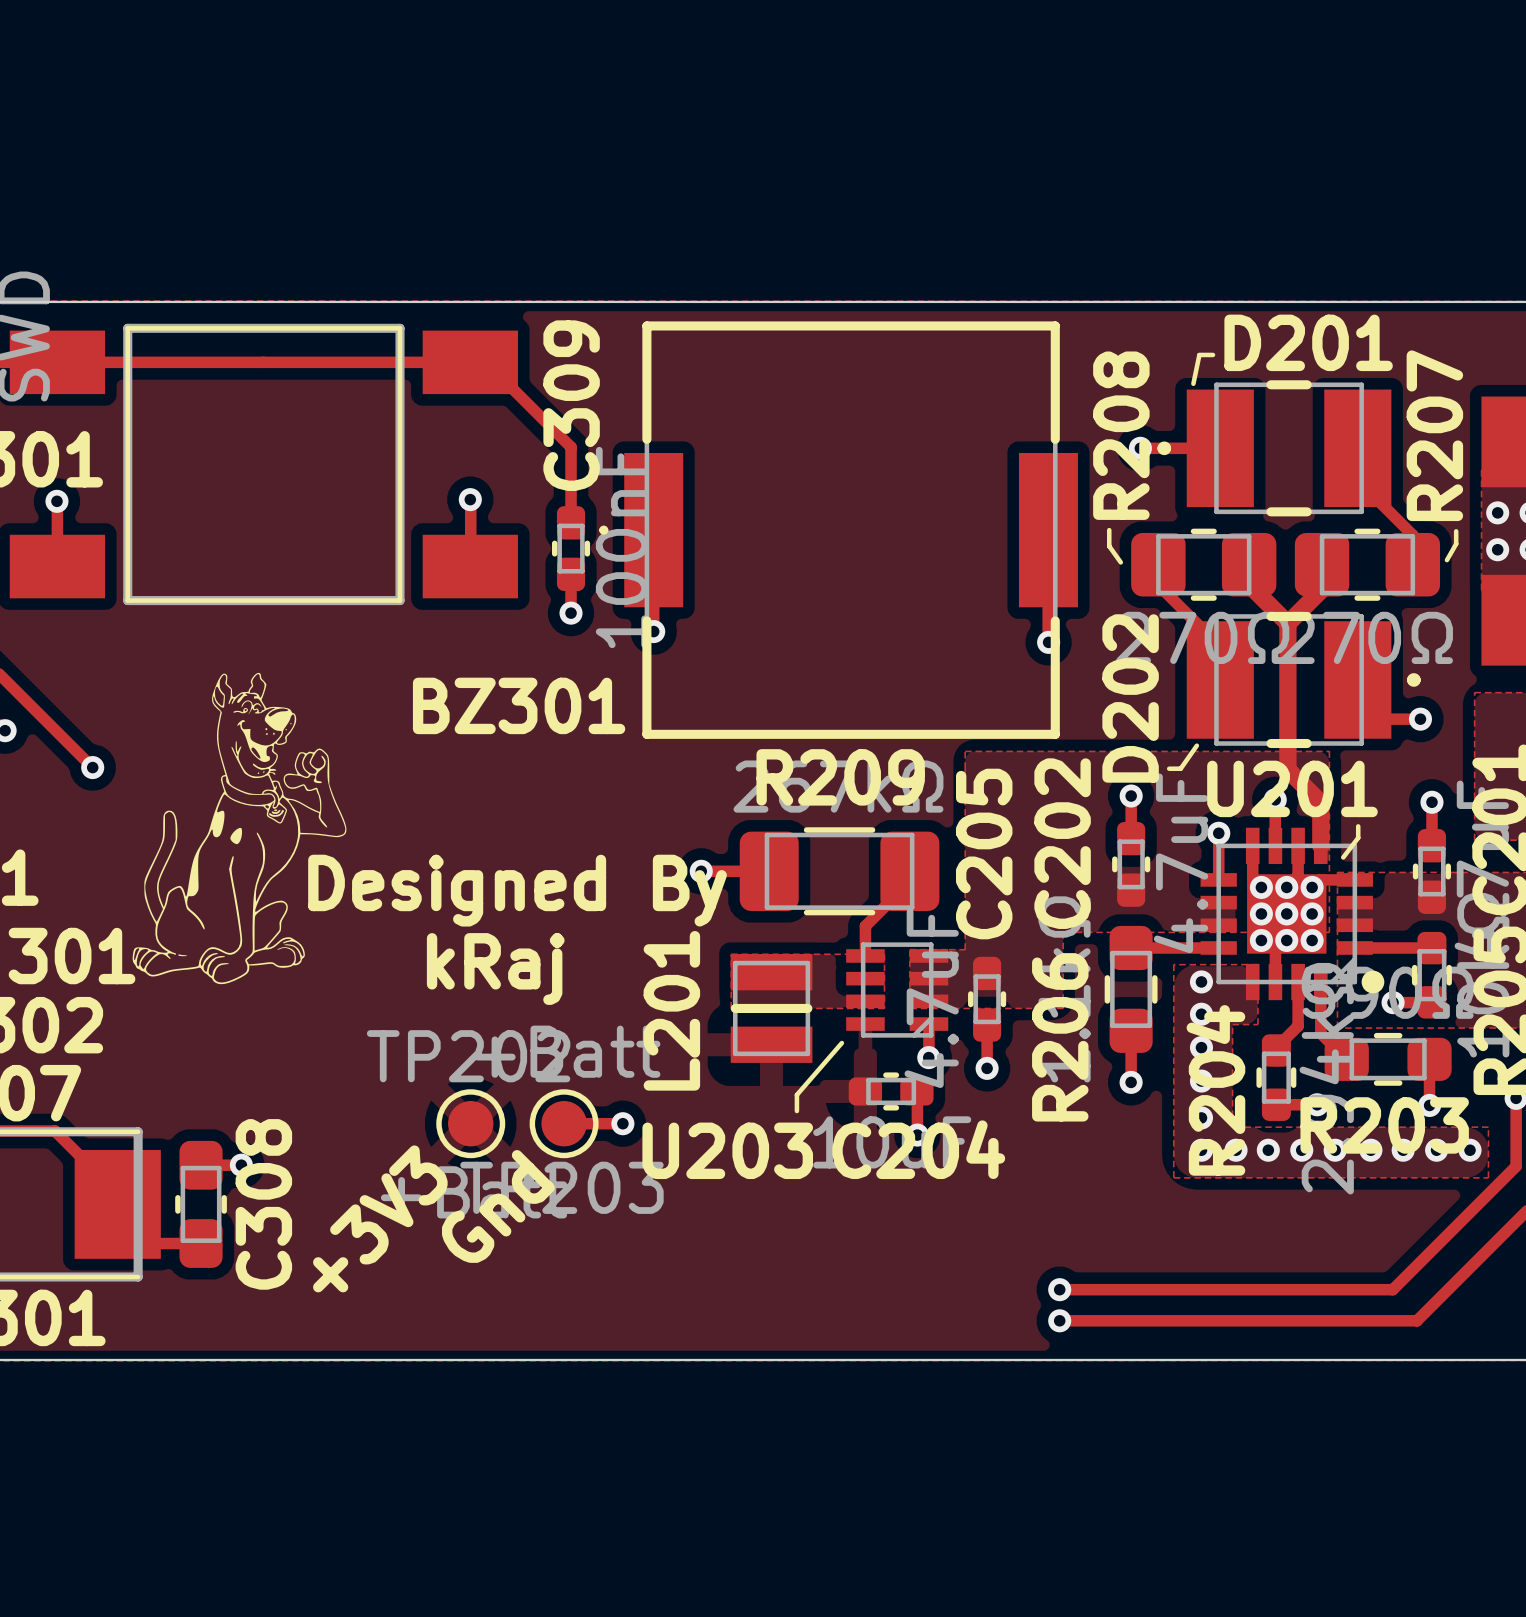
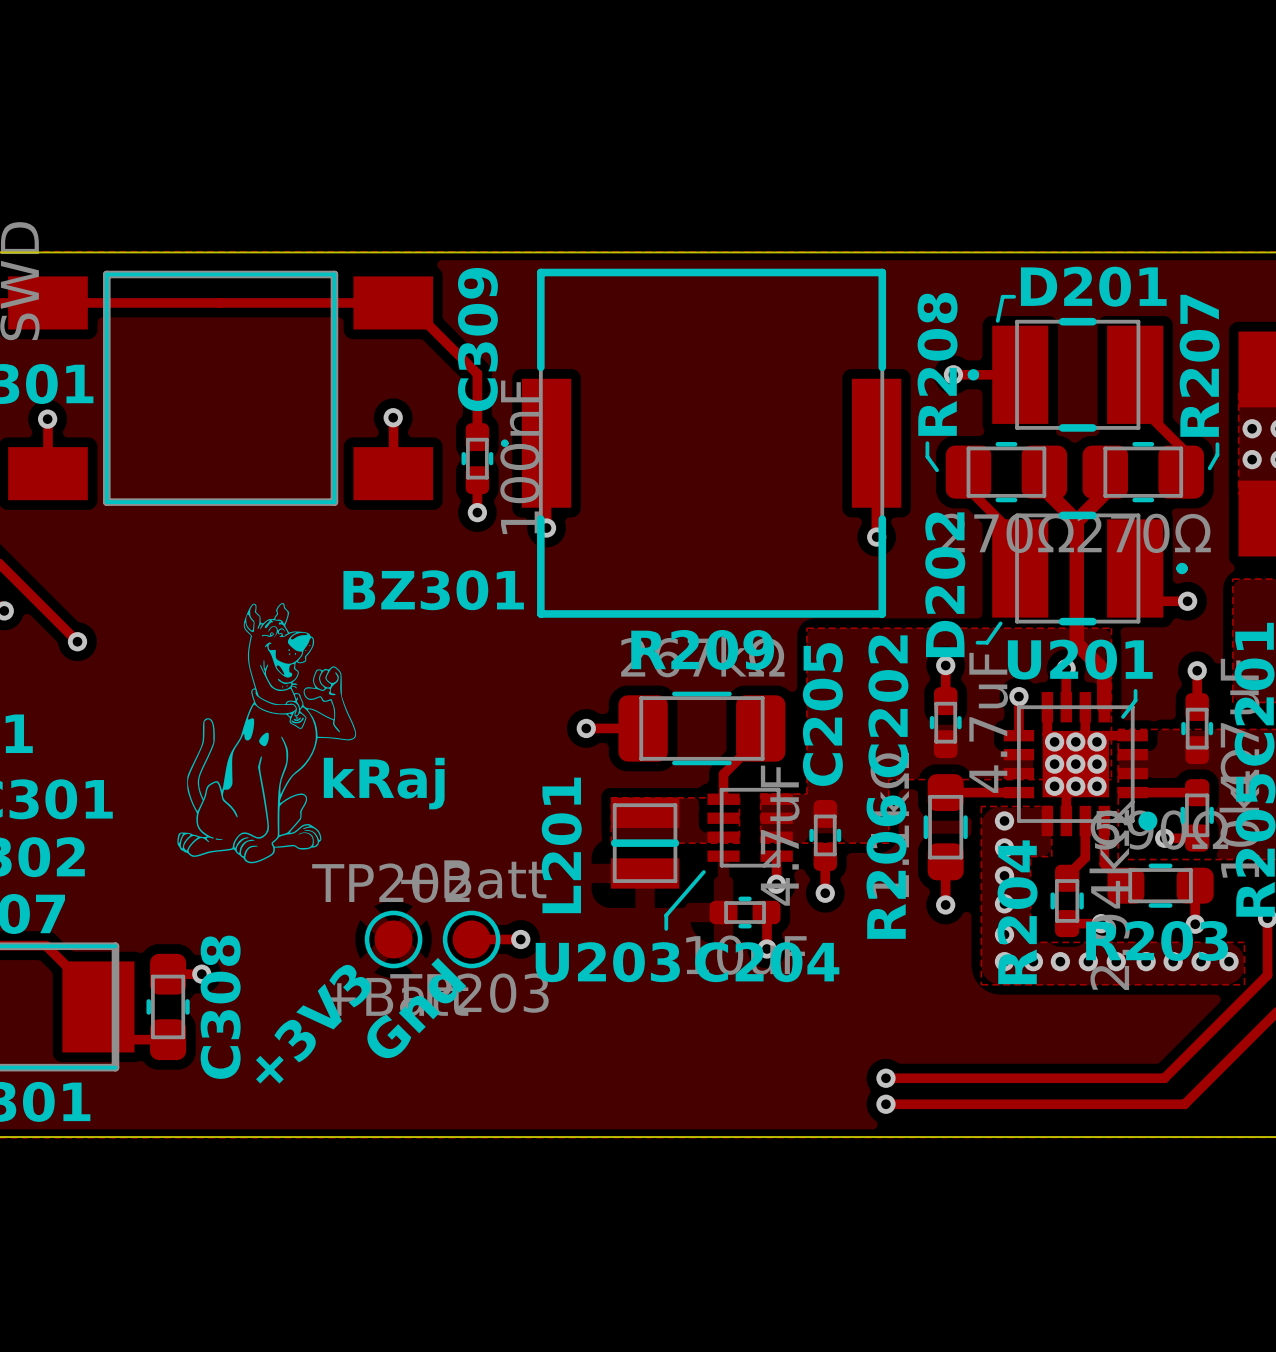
drawing position: (239, 828) -> (266, 733)
text: Designed By (517, 890) -> none
text position: kRaj (495, 969) -> kRaj (384, 783)

